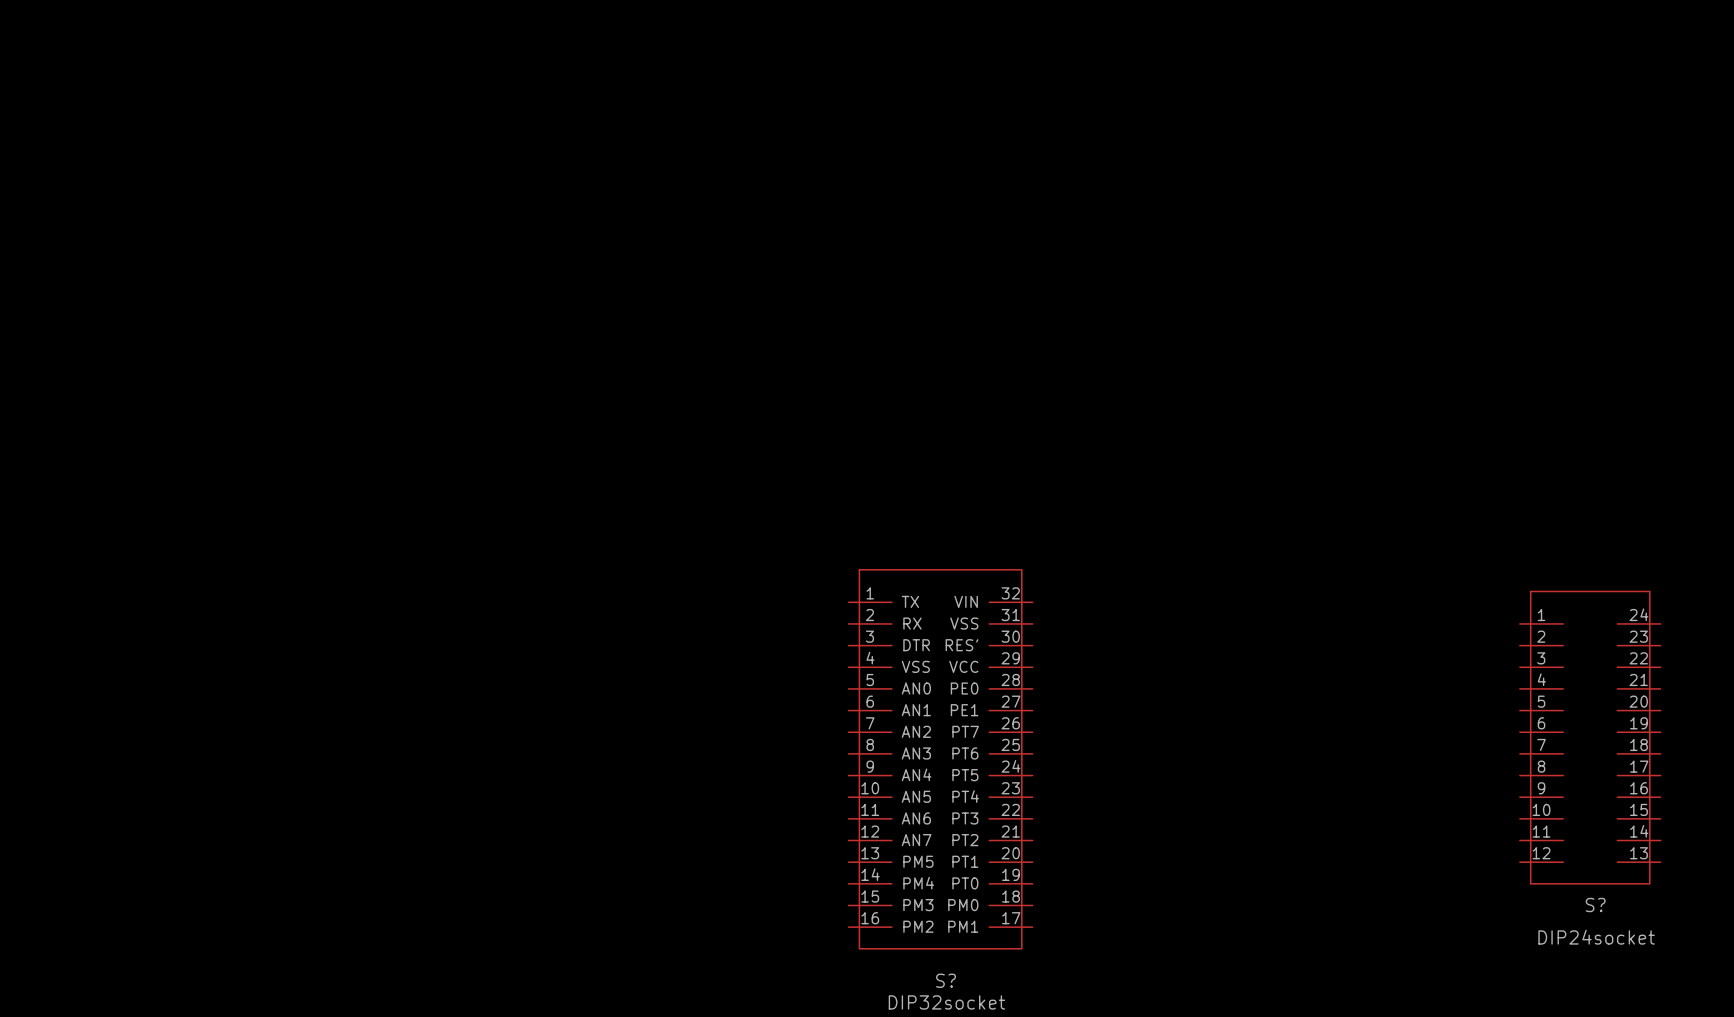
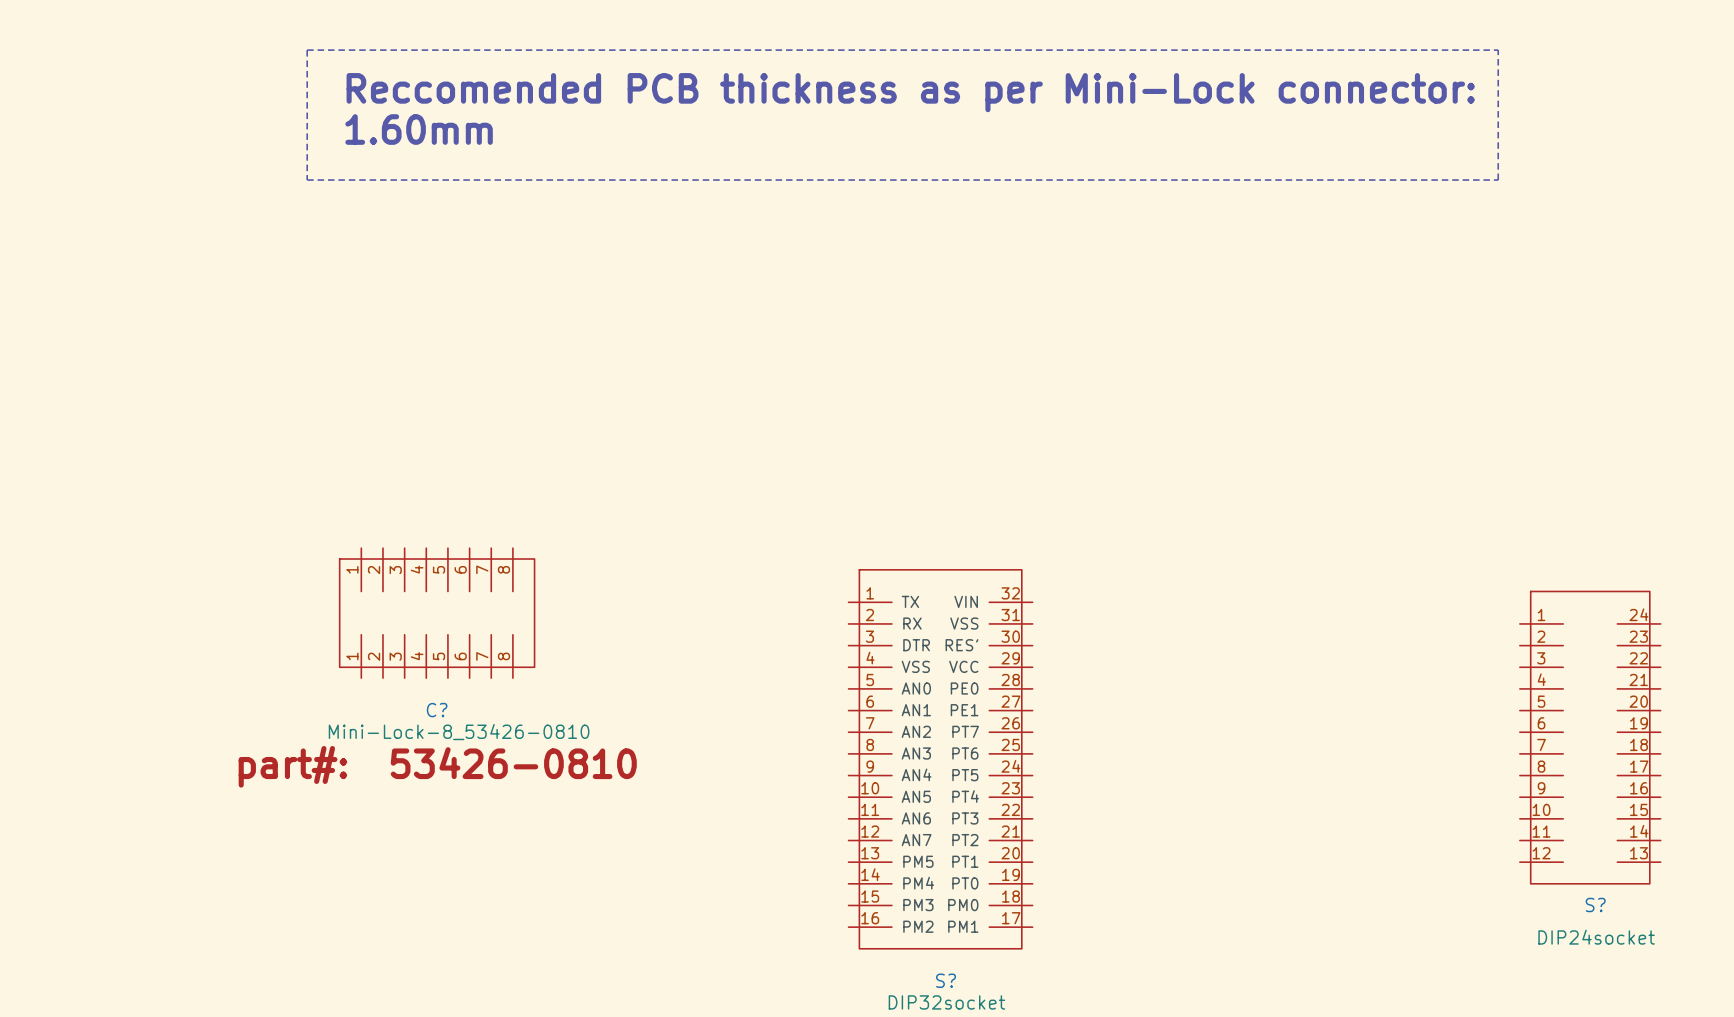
line: none -> (307, 50) (307, 180) (1498, 180) (1498, 50) (307, 50)
text: none -> Reccomended PCB thickness as per Mini-Lock connector: (910, 92)
text: none -> 1.60mm (419, 129)
C?: none -> Mini-Lock-8_53426-0810 (437, 613)

